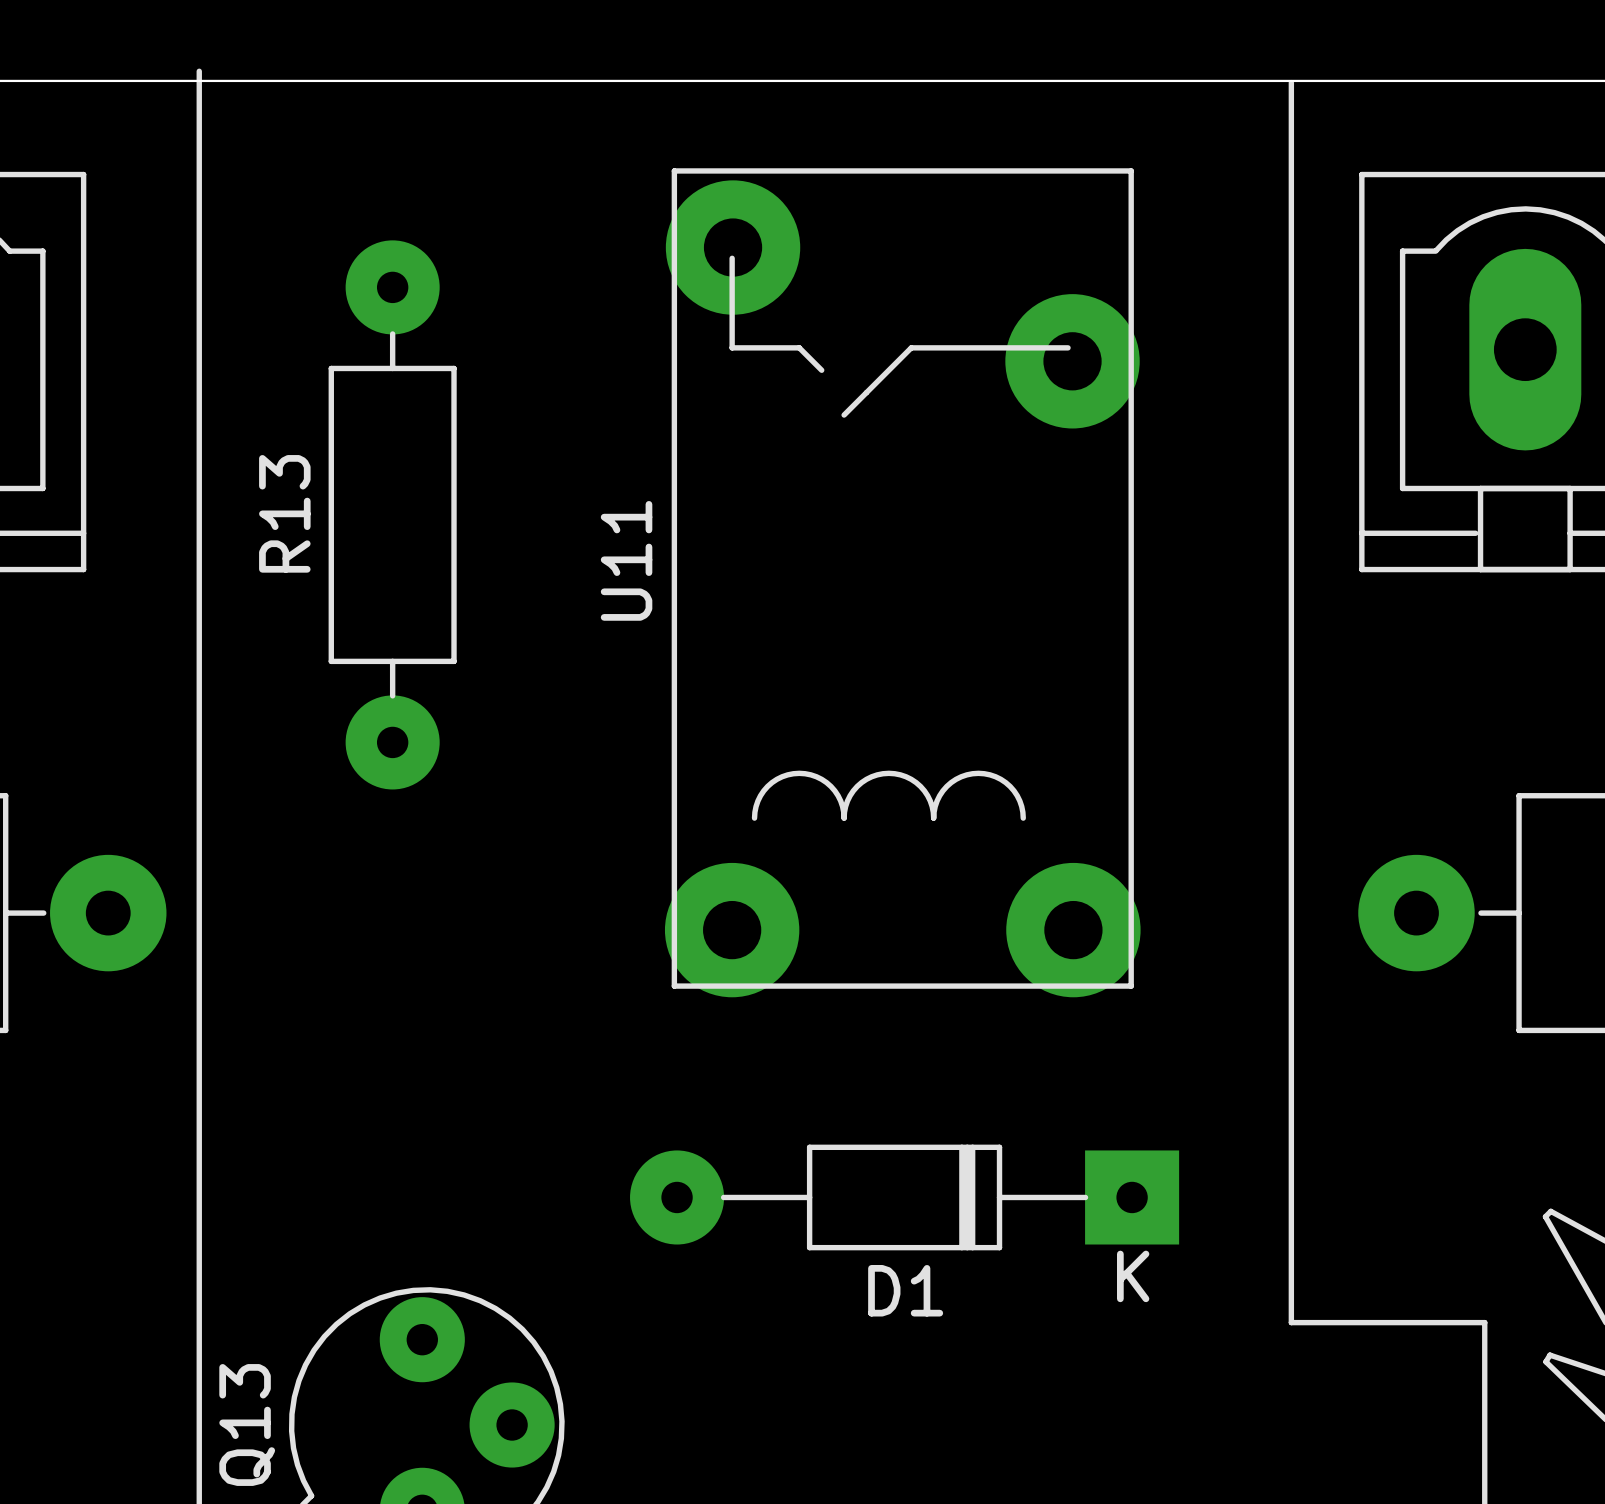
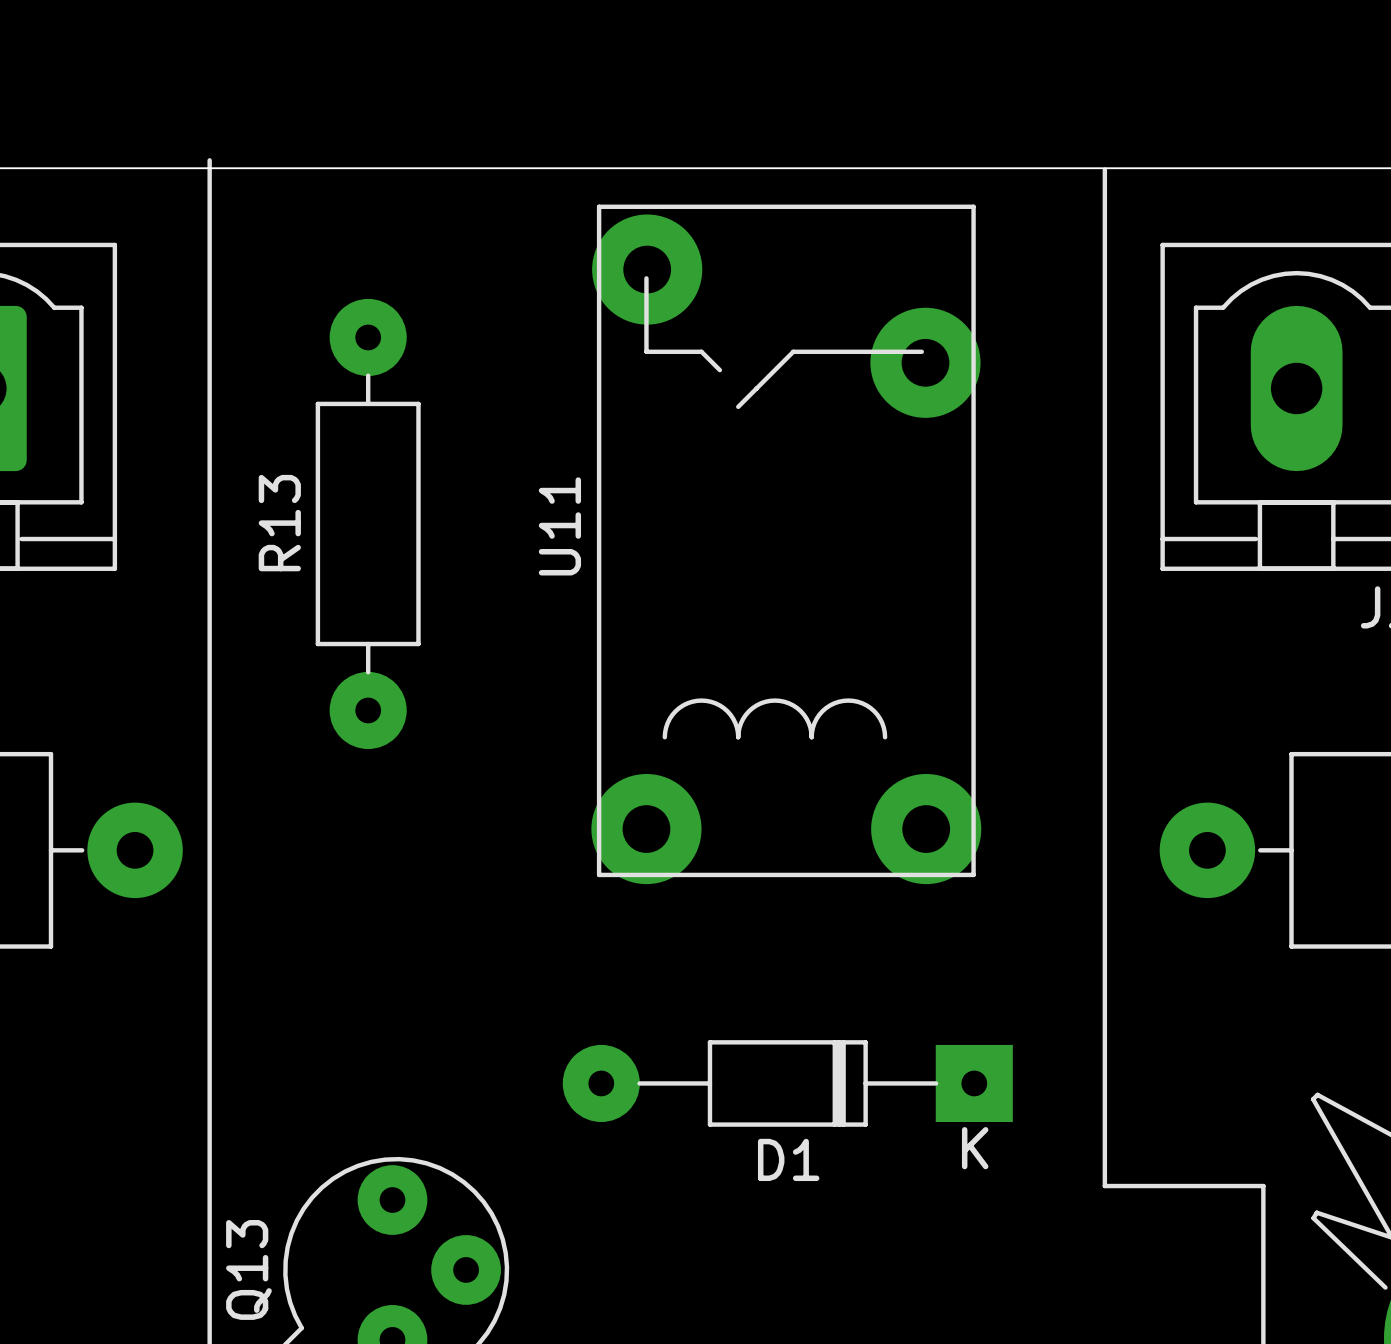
U11 position: (902, 582) -> (786, 544)

